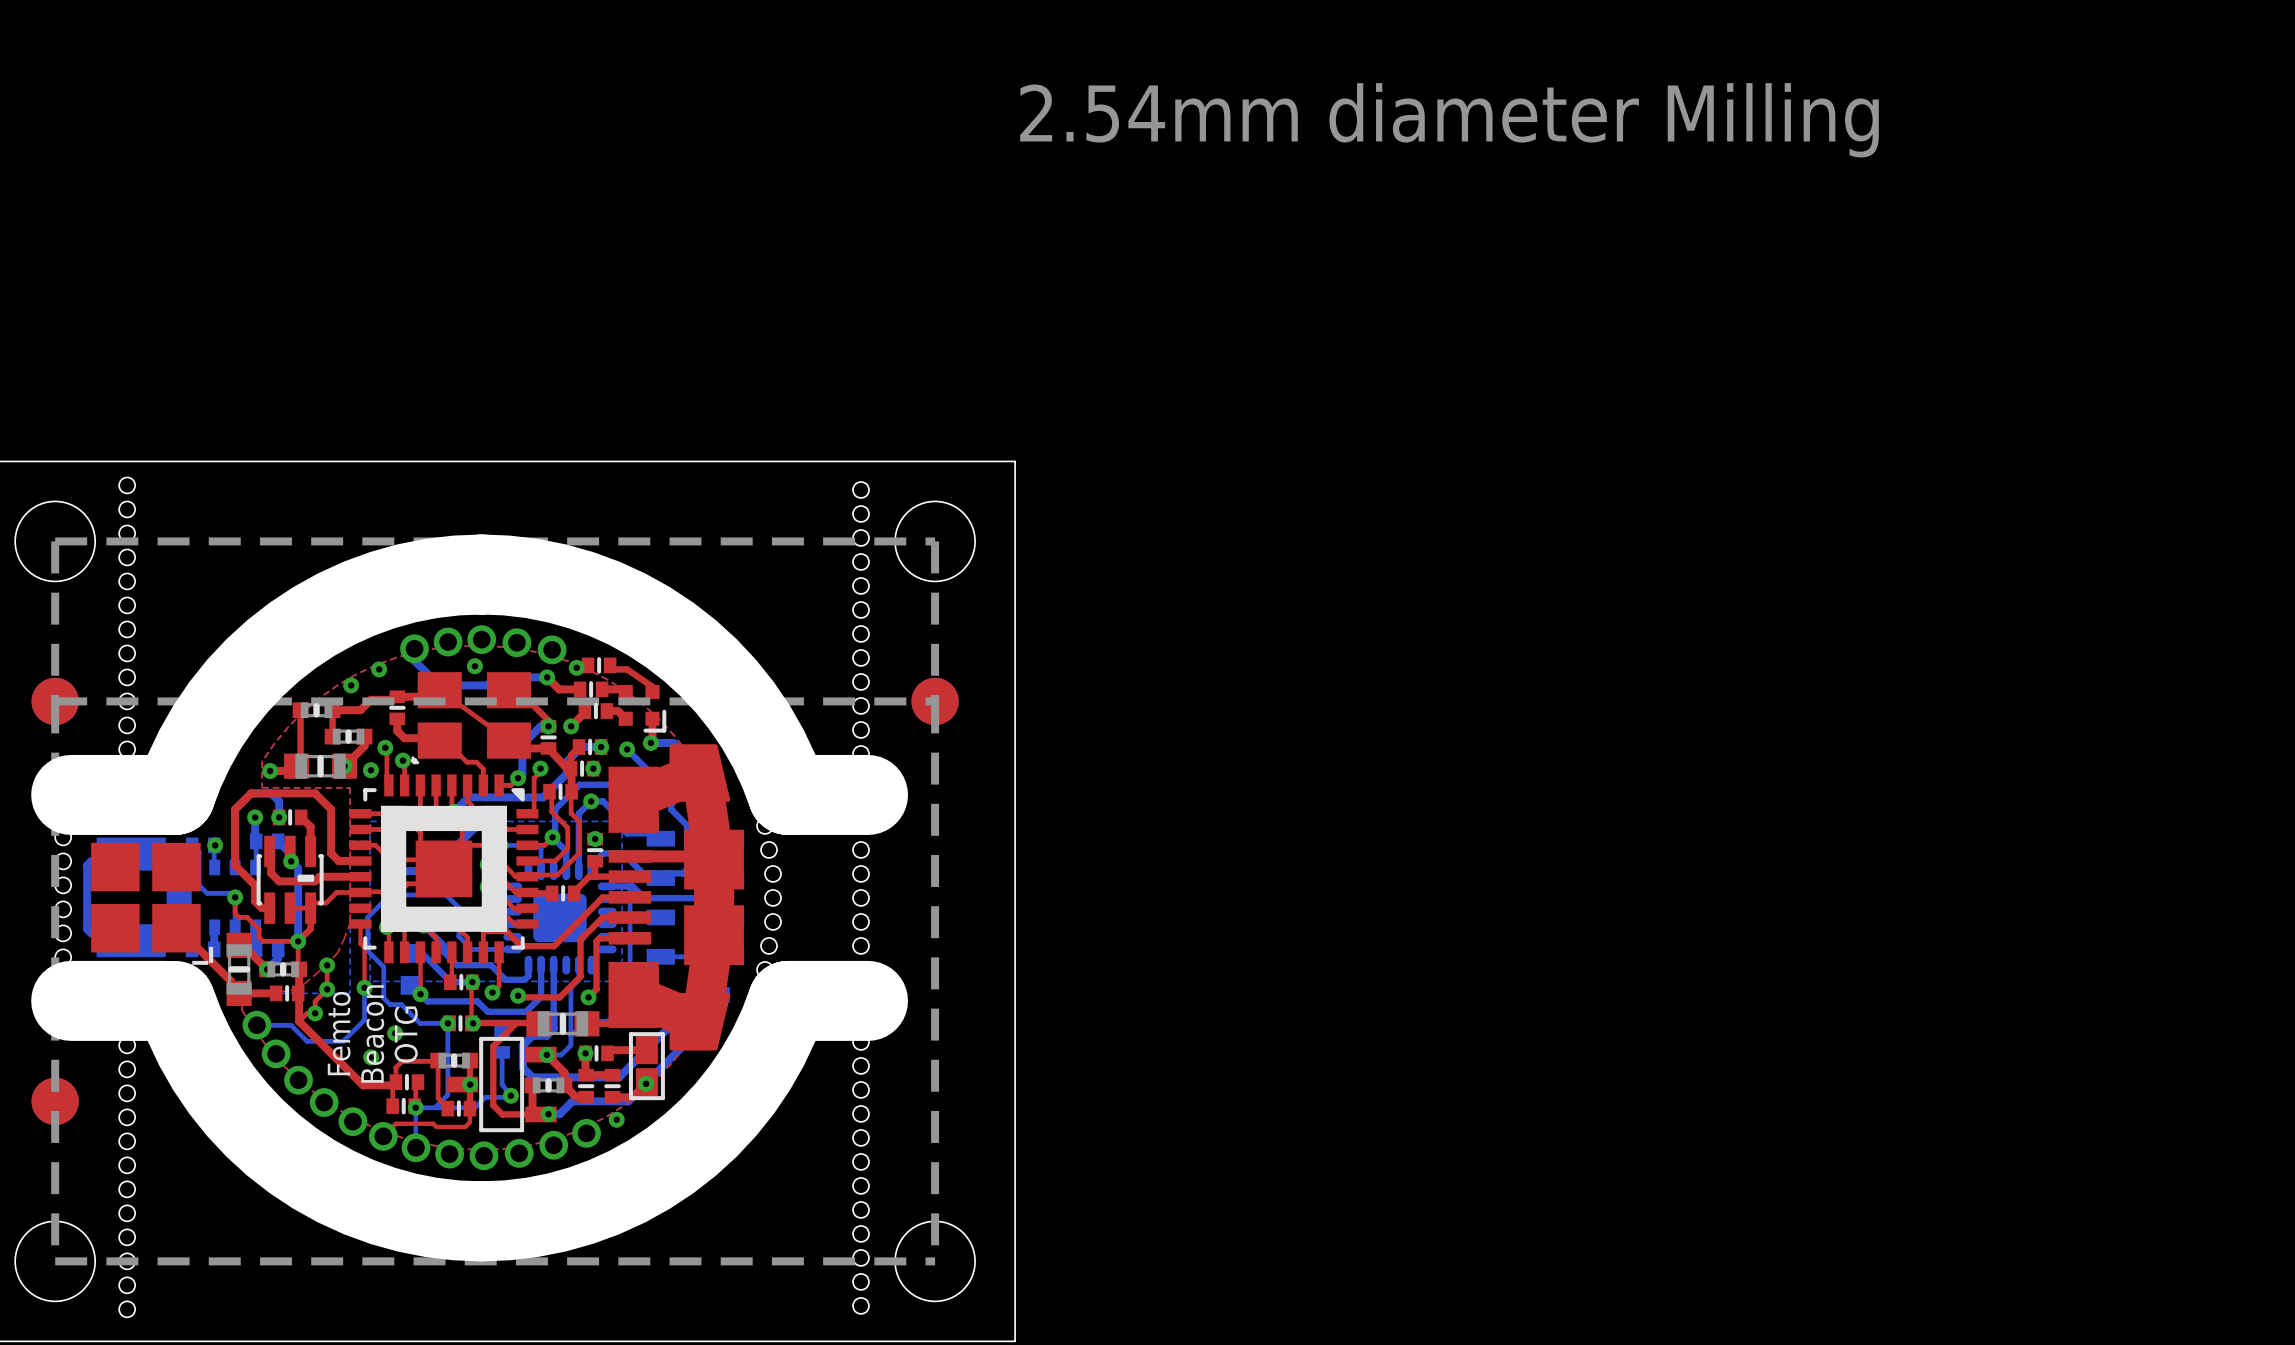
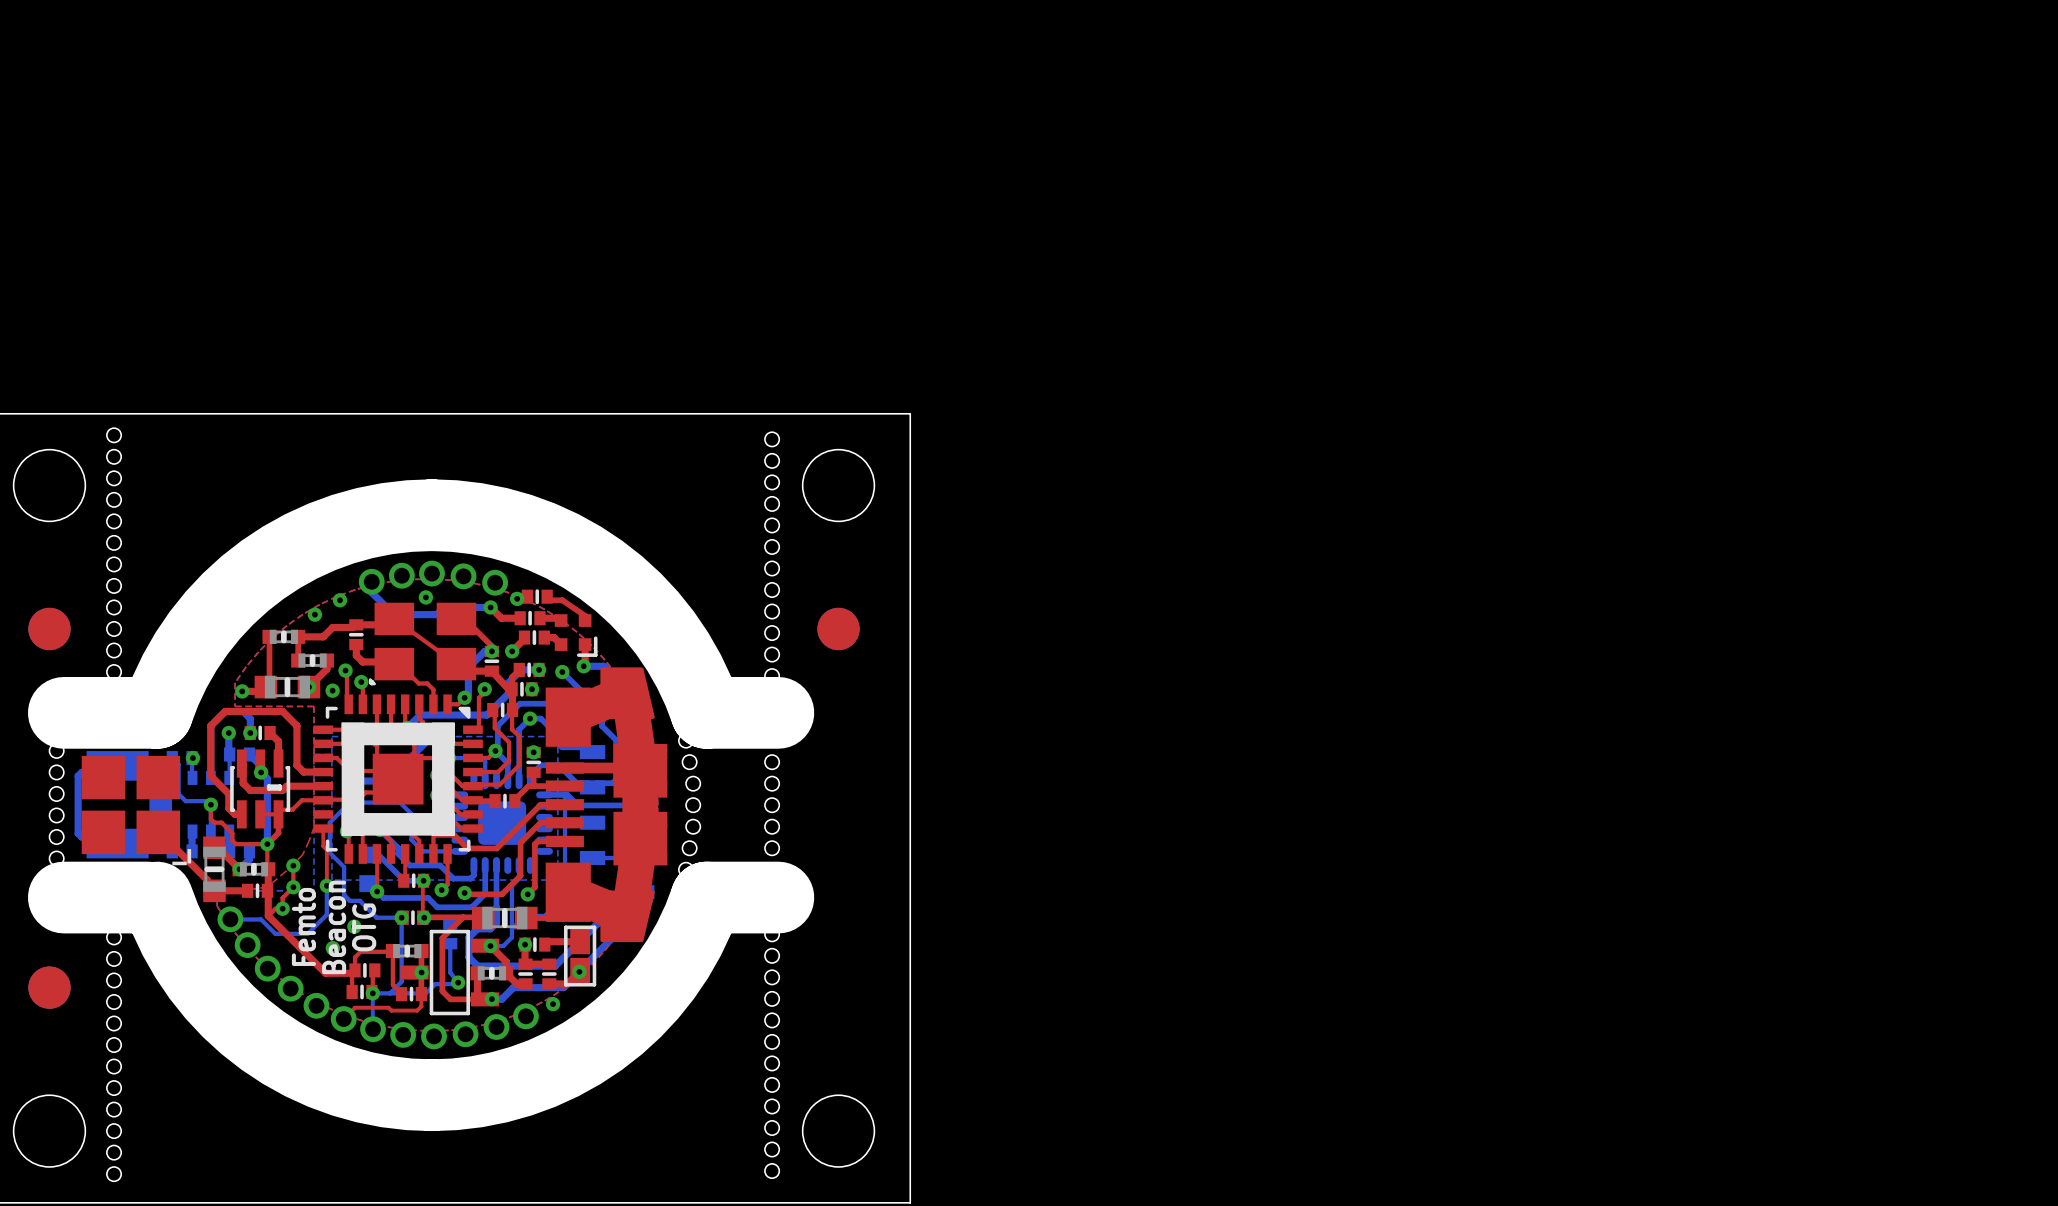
text: 2.54mm diameter Milling (1449, 120) -> none
line: (55, 541) (55, 1261) (935, 1261) (935, 541) (55, 541) -> none
line: (55, 701) (935, 701) -> none

